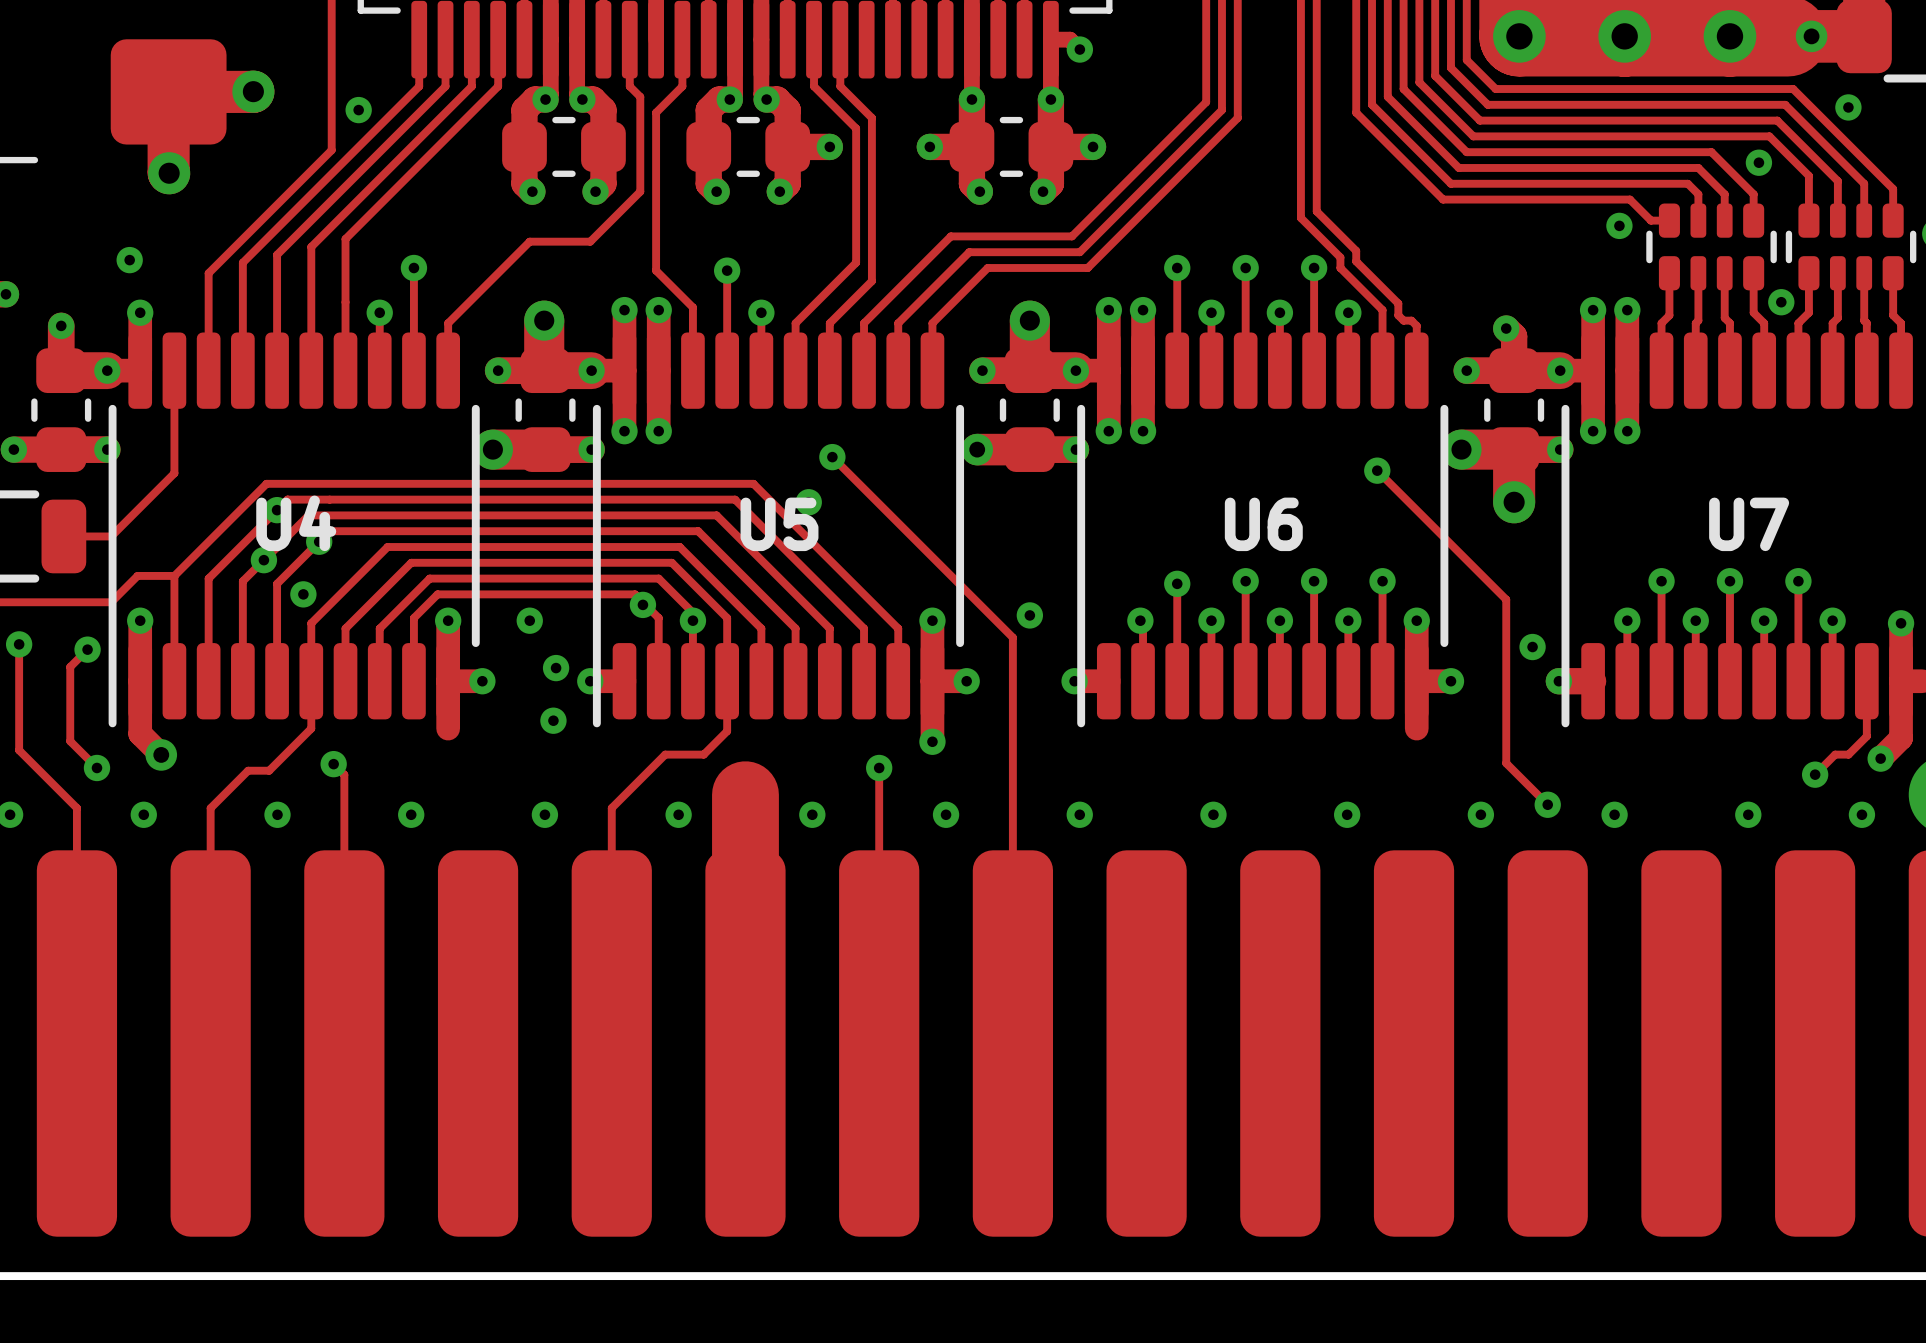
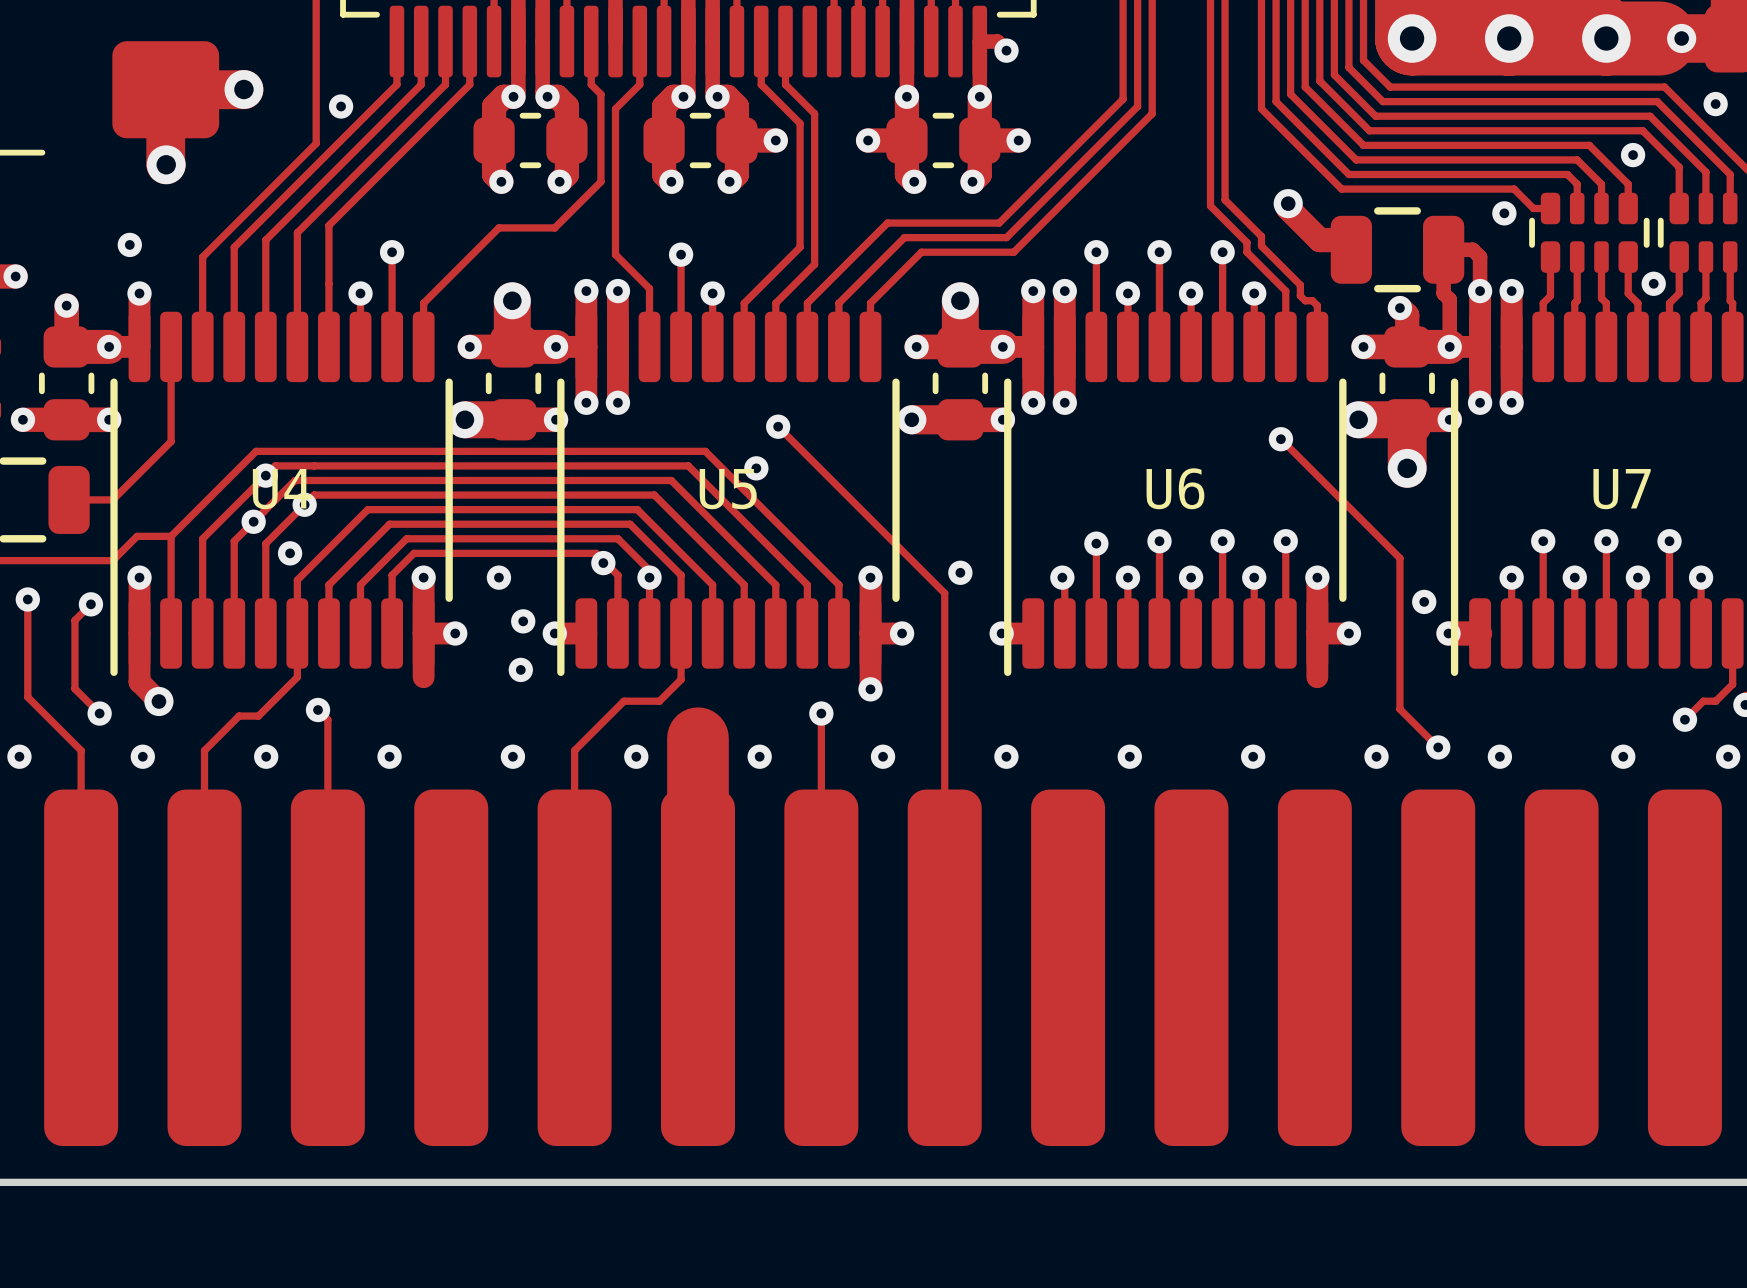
track: none -> (1288, 203) (1288, 208) (1319, 240) (1341, 240) (1351, 249)
via: none -> (1288, 203)
part: none -> (1397, 249)
track: none -> (1480, 291) (1480, 257) (1472, 249) (1443, 249) (1443, 293) (1449, 299) (1449, 346)

